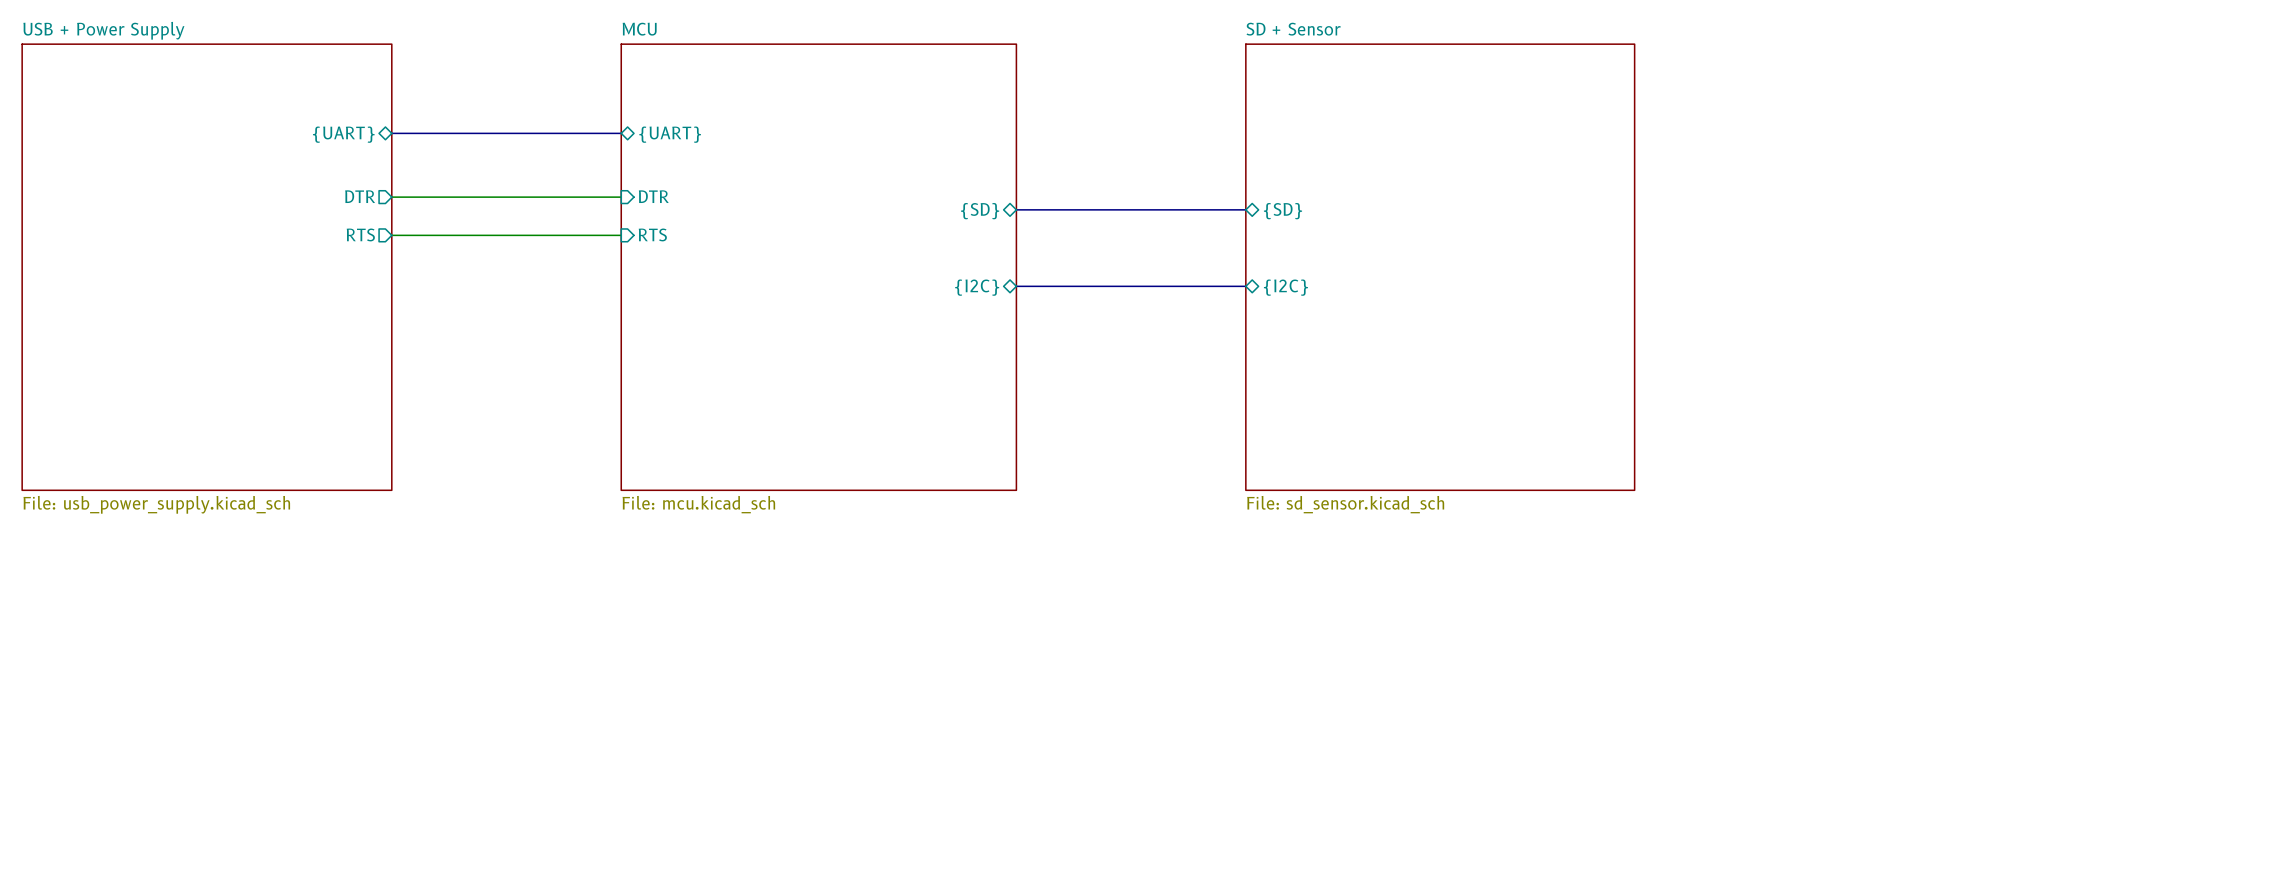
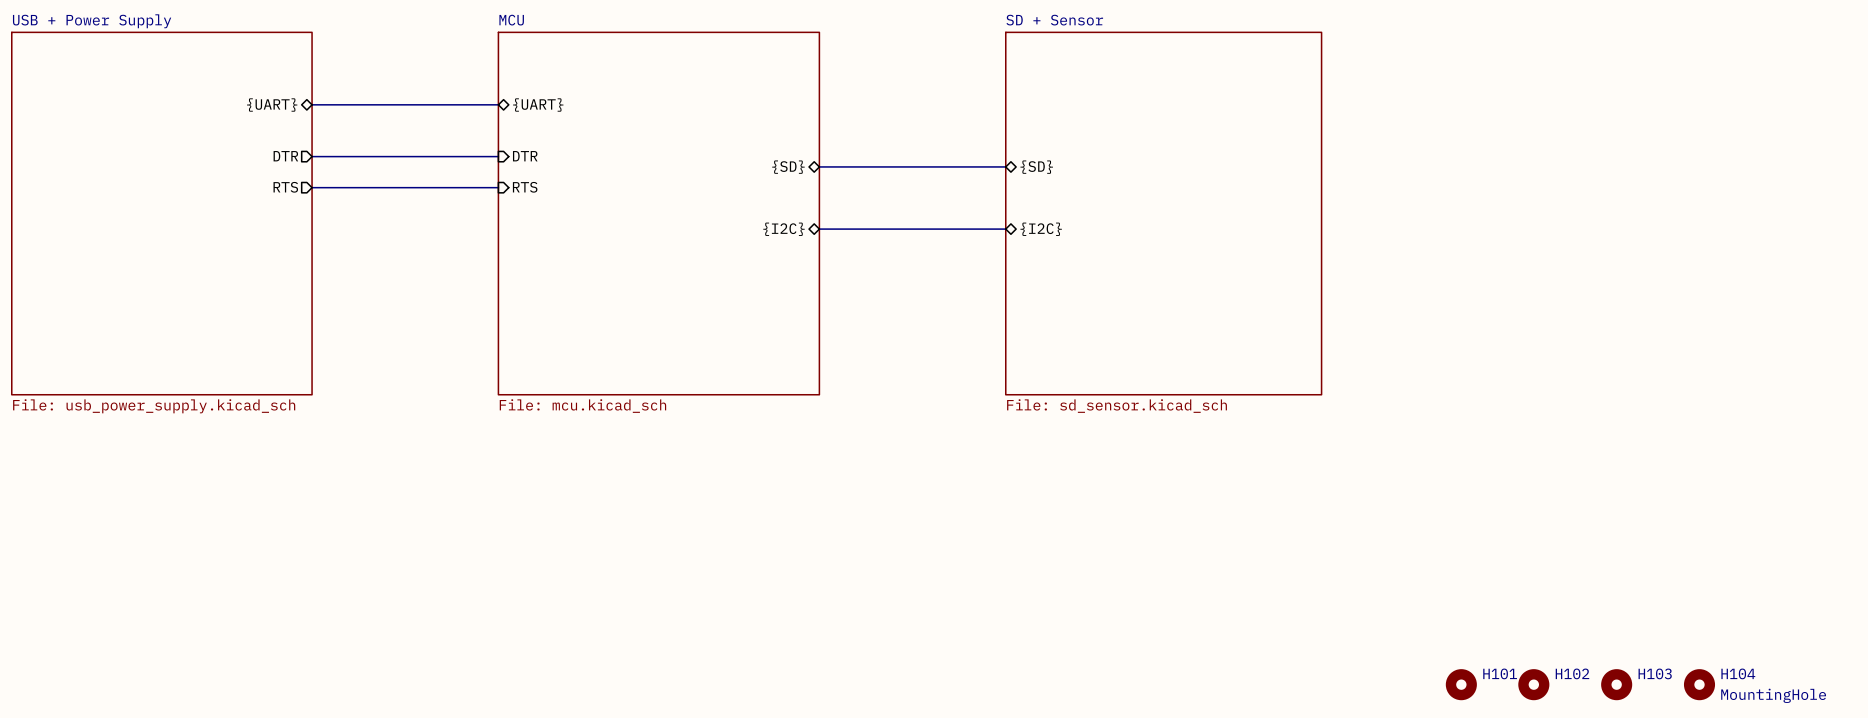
H101: none -> (1461, 684)
H102: none -> (1533, 684)
H103: none -> (1616, 684)
H104: none -> MountingHole (1699, 684)

